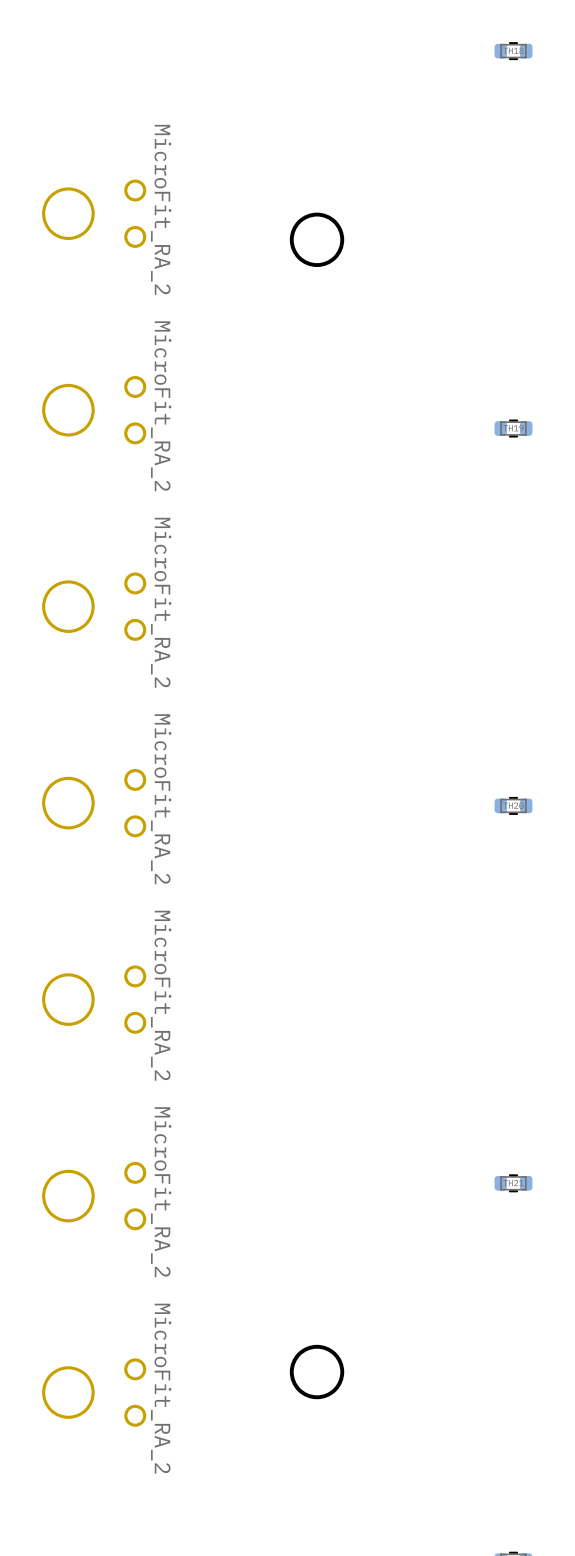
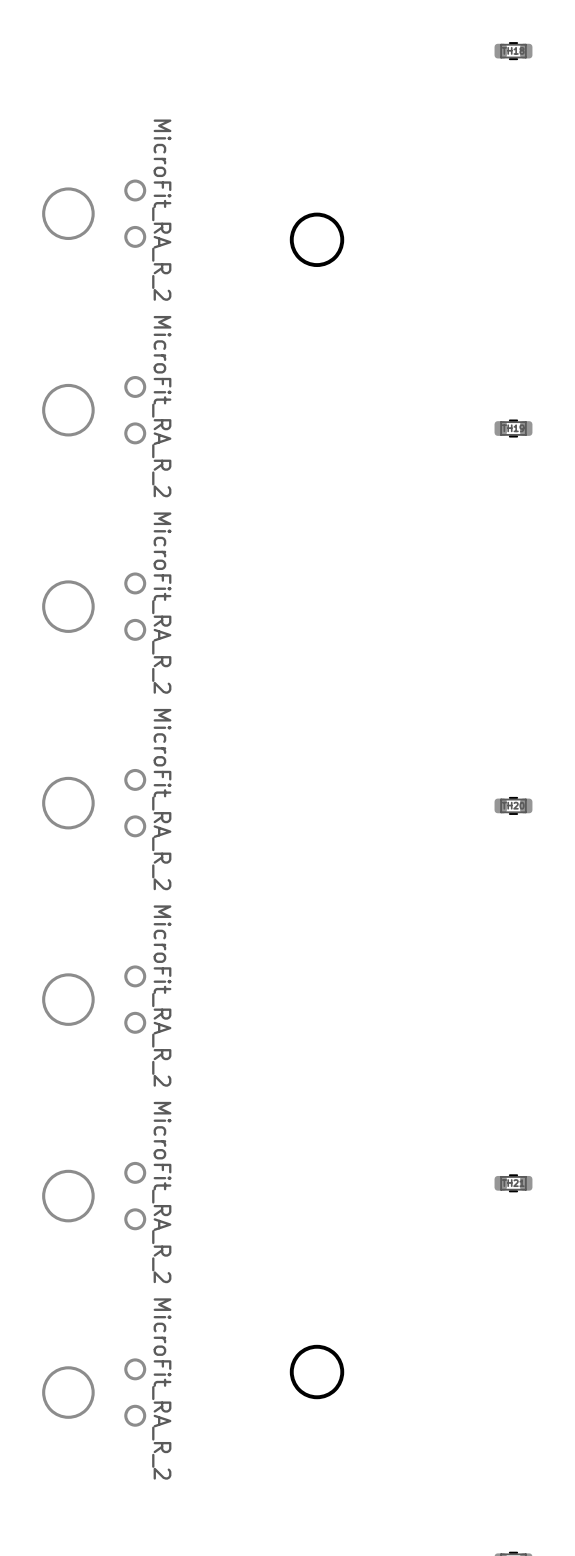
part value: MicroFit_RA_2 (161, 209) -> MicroFit_RA_R_2 (161, 210)
part value: MicroFit_RA_2 (161, 406) -> MicroFit_RA_R_2 (161, 406)
part value: MicroFit_RA_2 (161, 602) -> MicroFit_RA_R_2 (161, 603)
part value: MicroFit_RA_2 (161, 799) -> MicroFit_RA_R_2 (161, 799)
part value: MicroFit_RA_2 (161, 995) -> MicroFit_RA_R_2 (161, 996)
part value: MicroFit_RA_2 (161, 1192) -> MicroFit_RA_R_2 (161, 1192)
part value: MicroFit_RA_2 (161, 1388) -> MicroFit_RA_R_2 (161, 1388)

